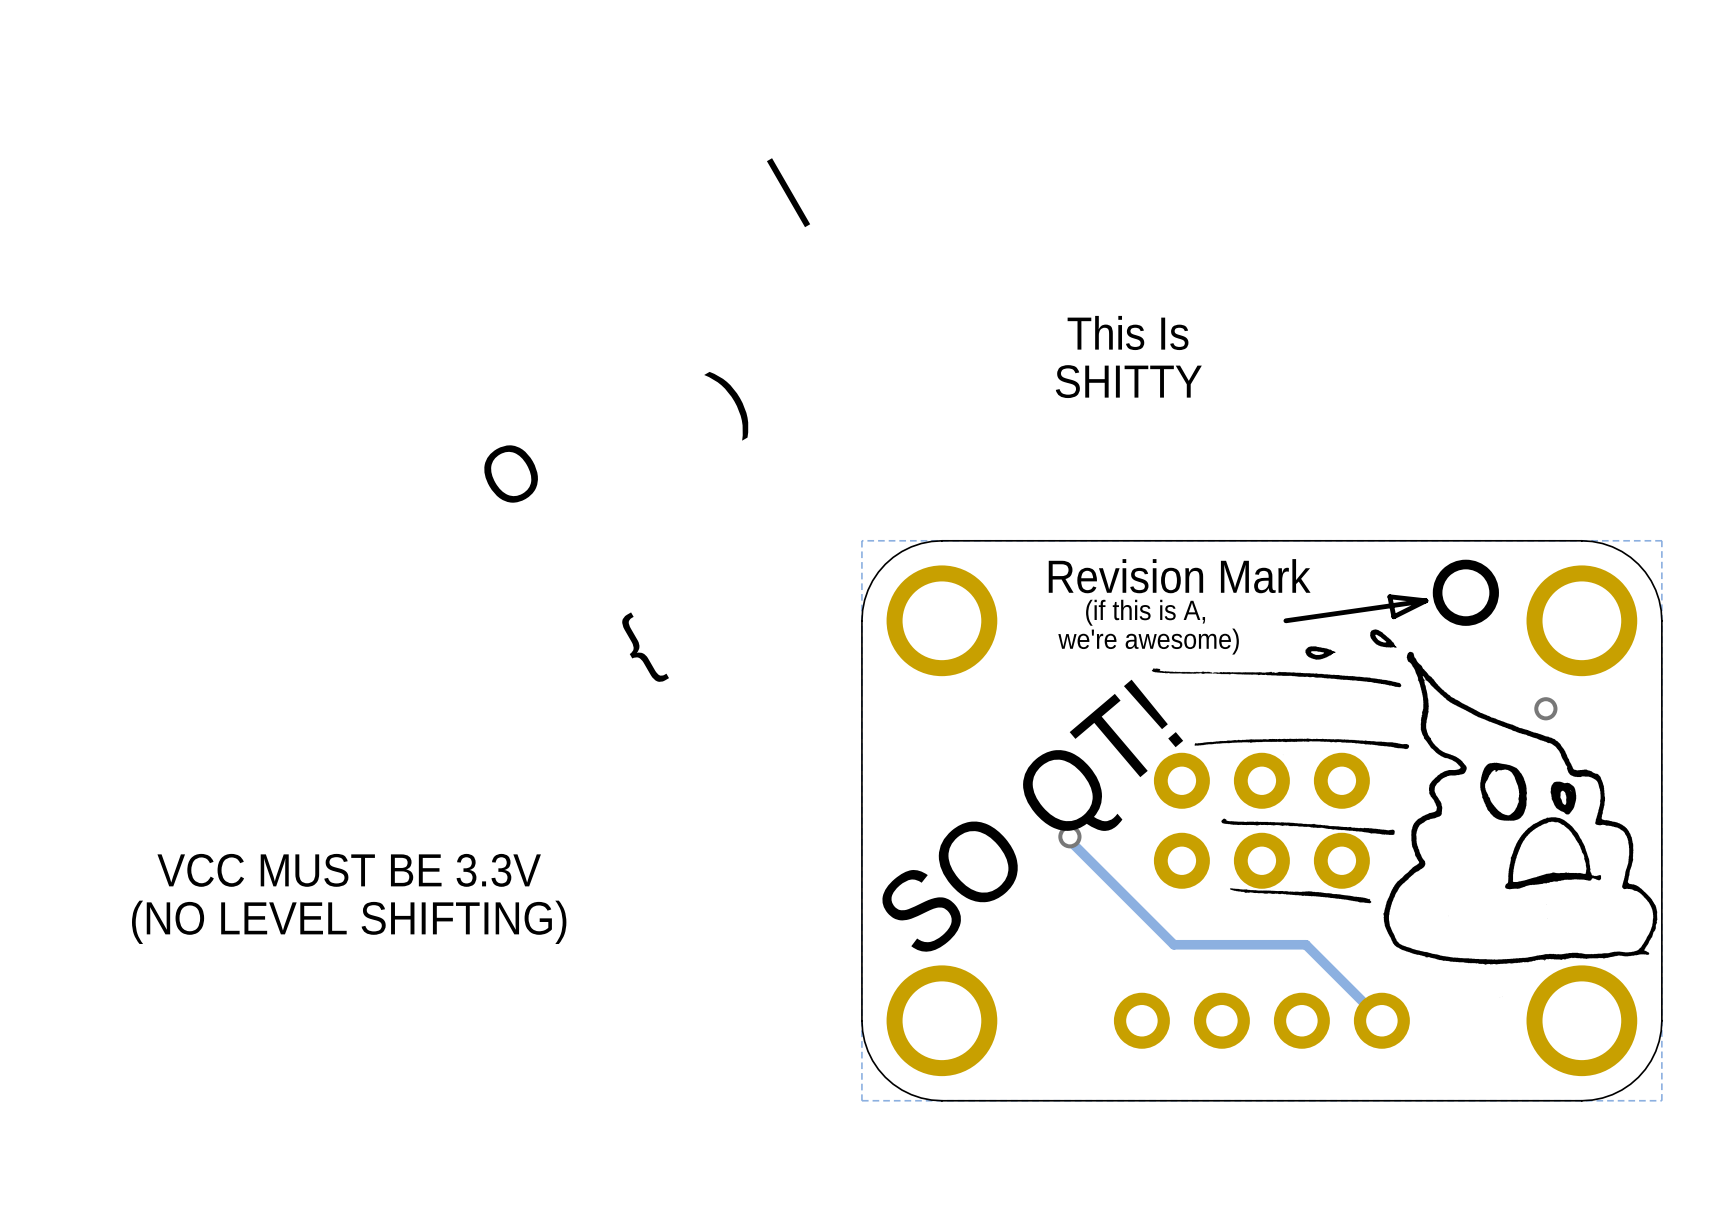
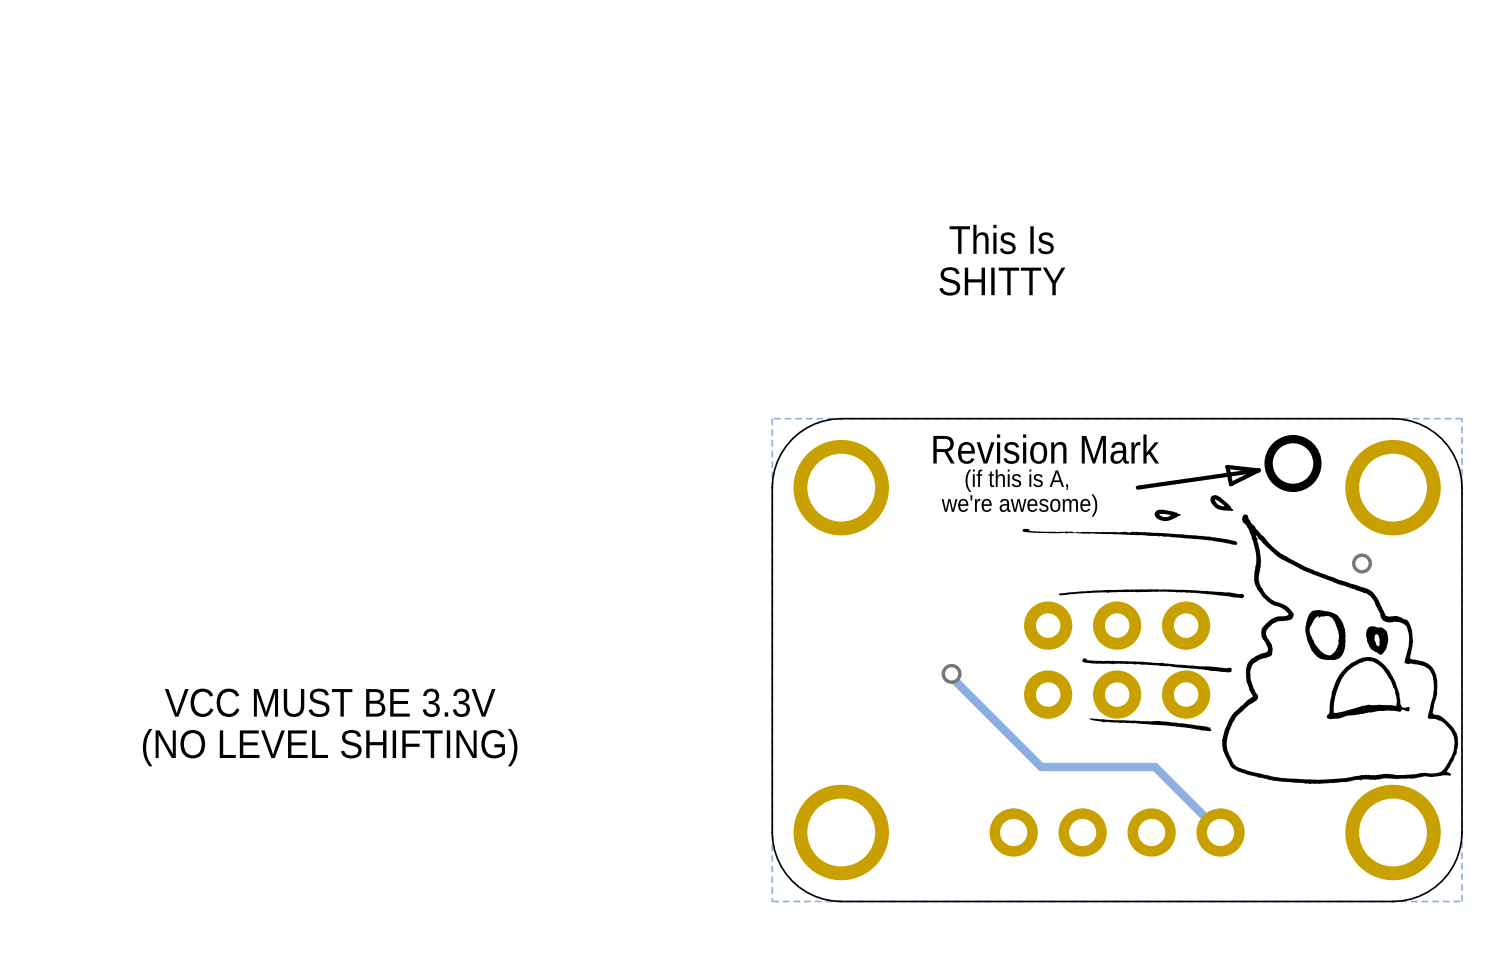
text: | (788, 192) -> none
text: ) (726, 406) -> none
text: O (510, 474) -> none
text: { (645, 647) -> none
text: SO QT! (1032, 819) -> none

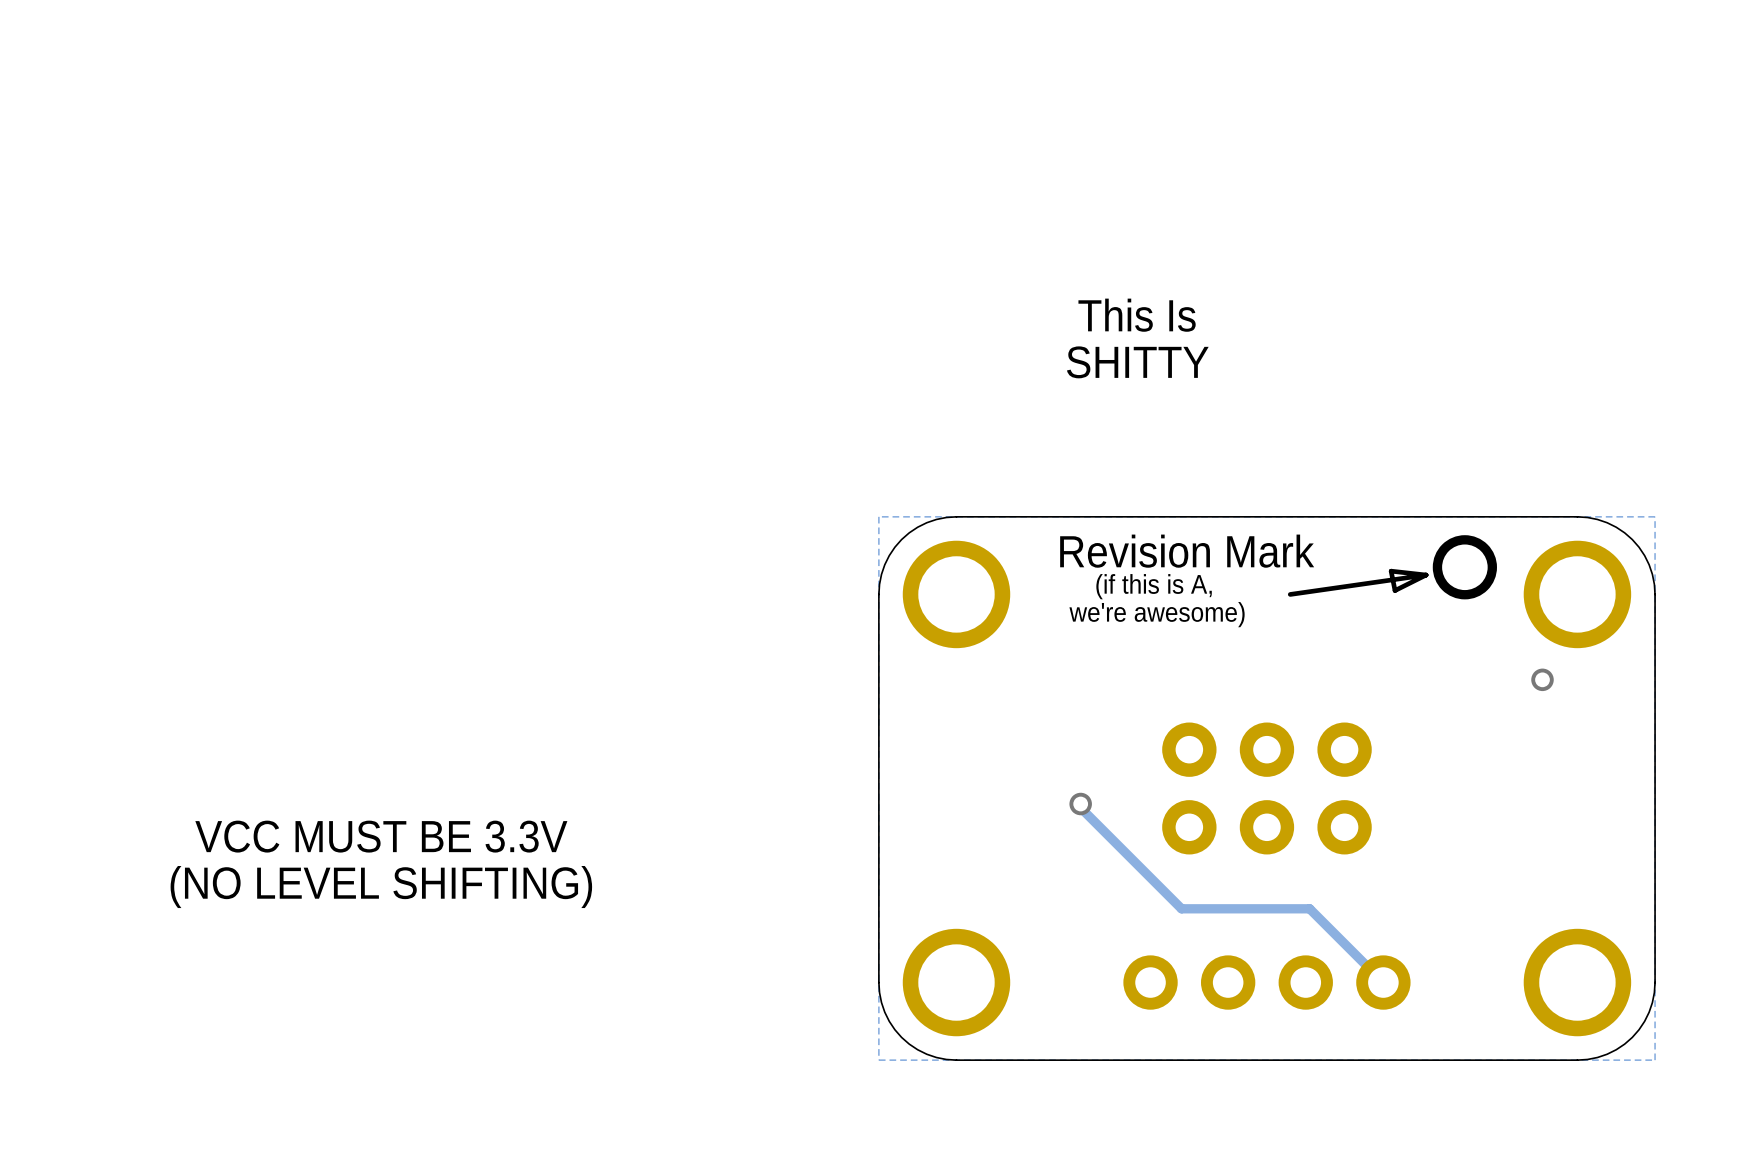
drawing: [1022, 495, 1459, 813] -> none

